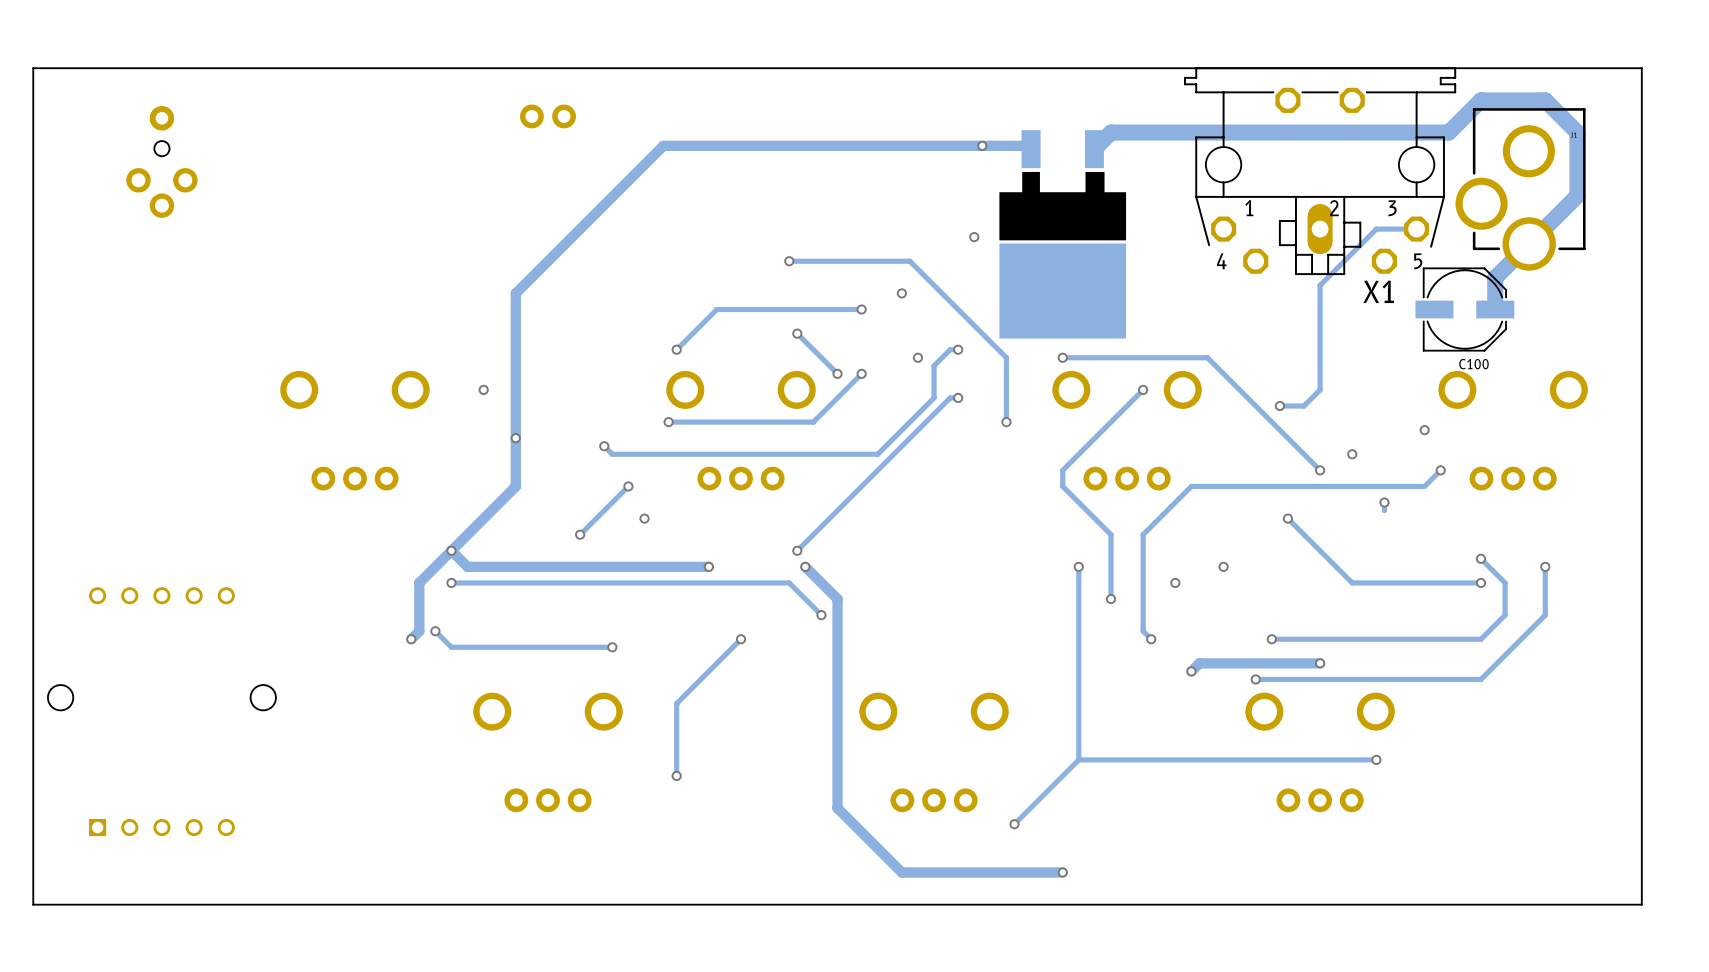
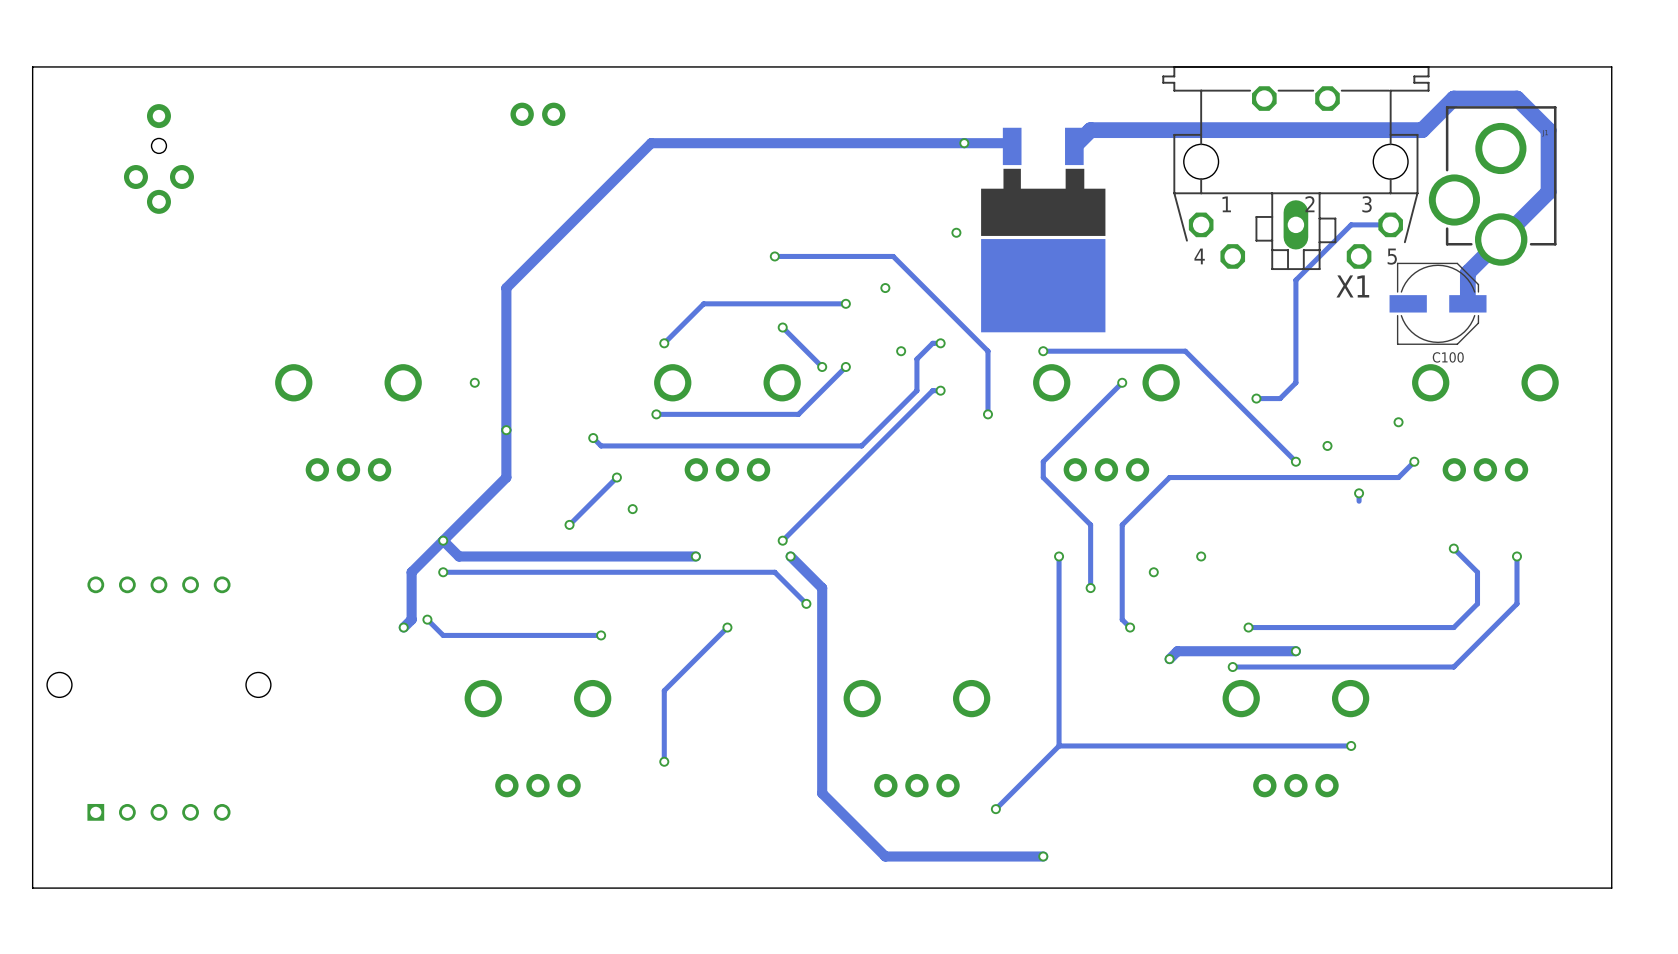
track: (1287, 518) (1352, 582) (1480, 582) -> none
via: (1287, 518) -> none
via: (1480, 582) -> none

